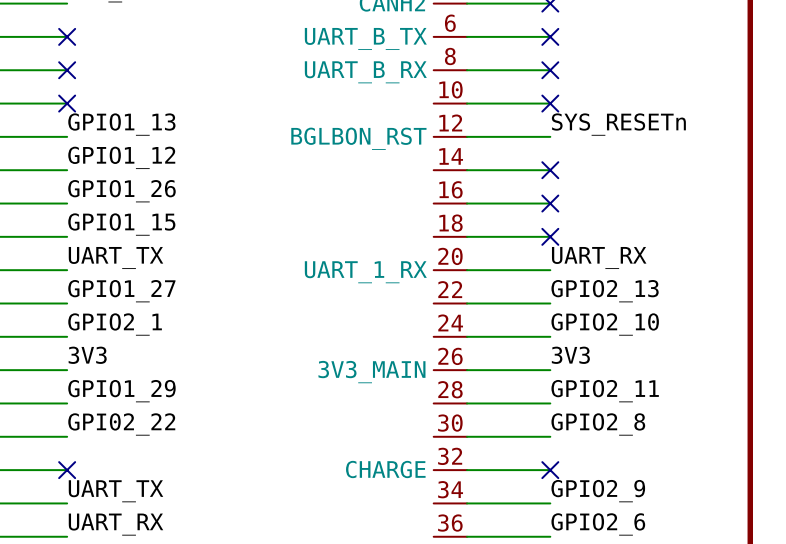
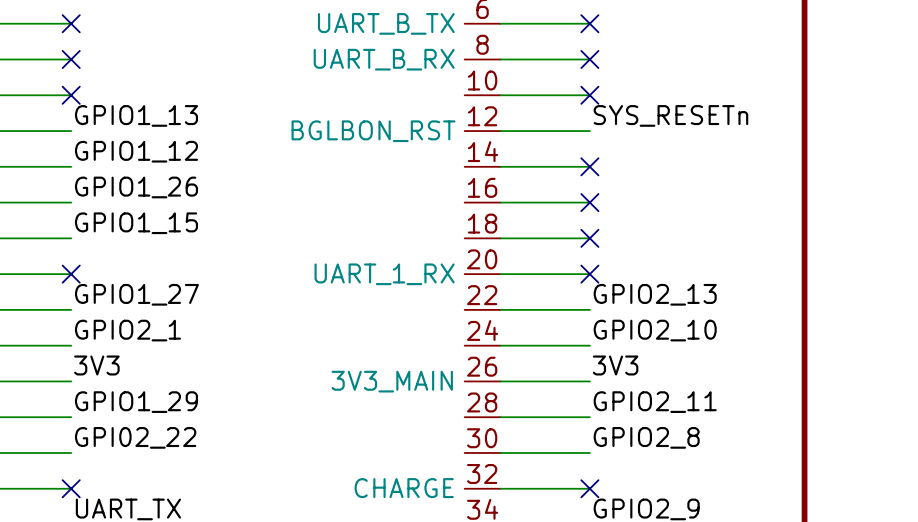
label: UART_TX (116, 258) -> none
label: UART_RX (599, 258) -> none
no-connect mark: none -> (71, 274)
no-connect mark: none -> (589, 274)

